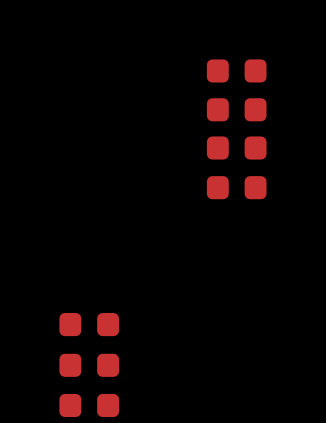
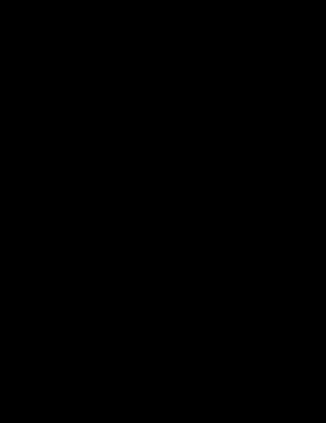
part: (236, 70) -> none
part: (236, 109) -> none
part: (236, 148) -> none
part: (236, 187) -> none
part: (89, 324) -> none
part: (89, 365) -> none
part: (89, 405) -> none

